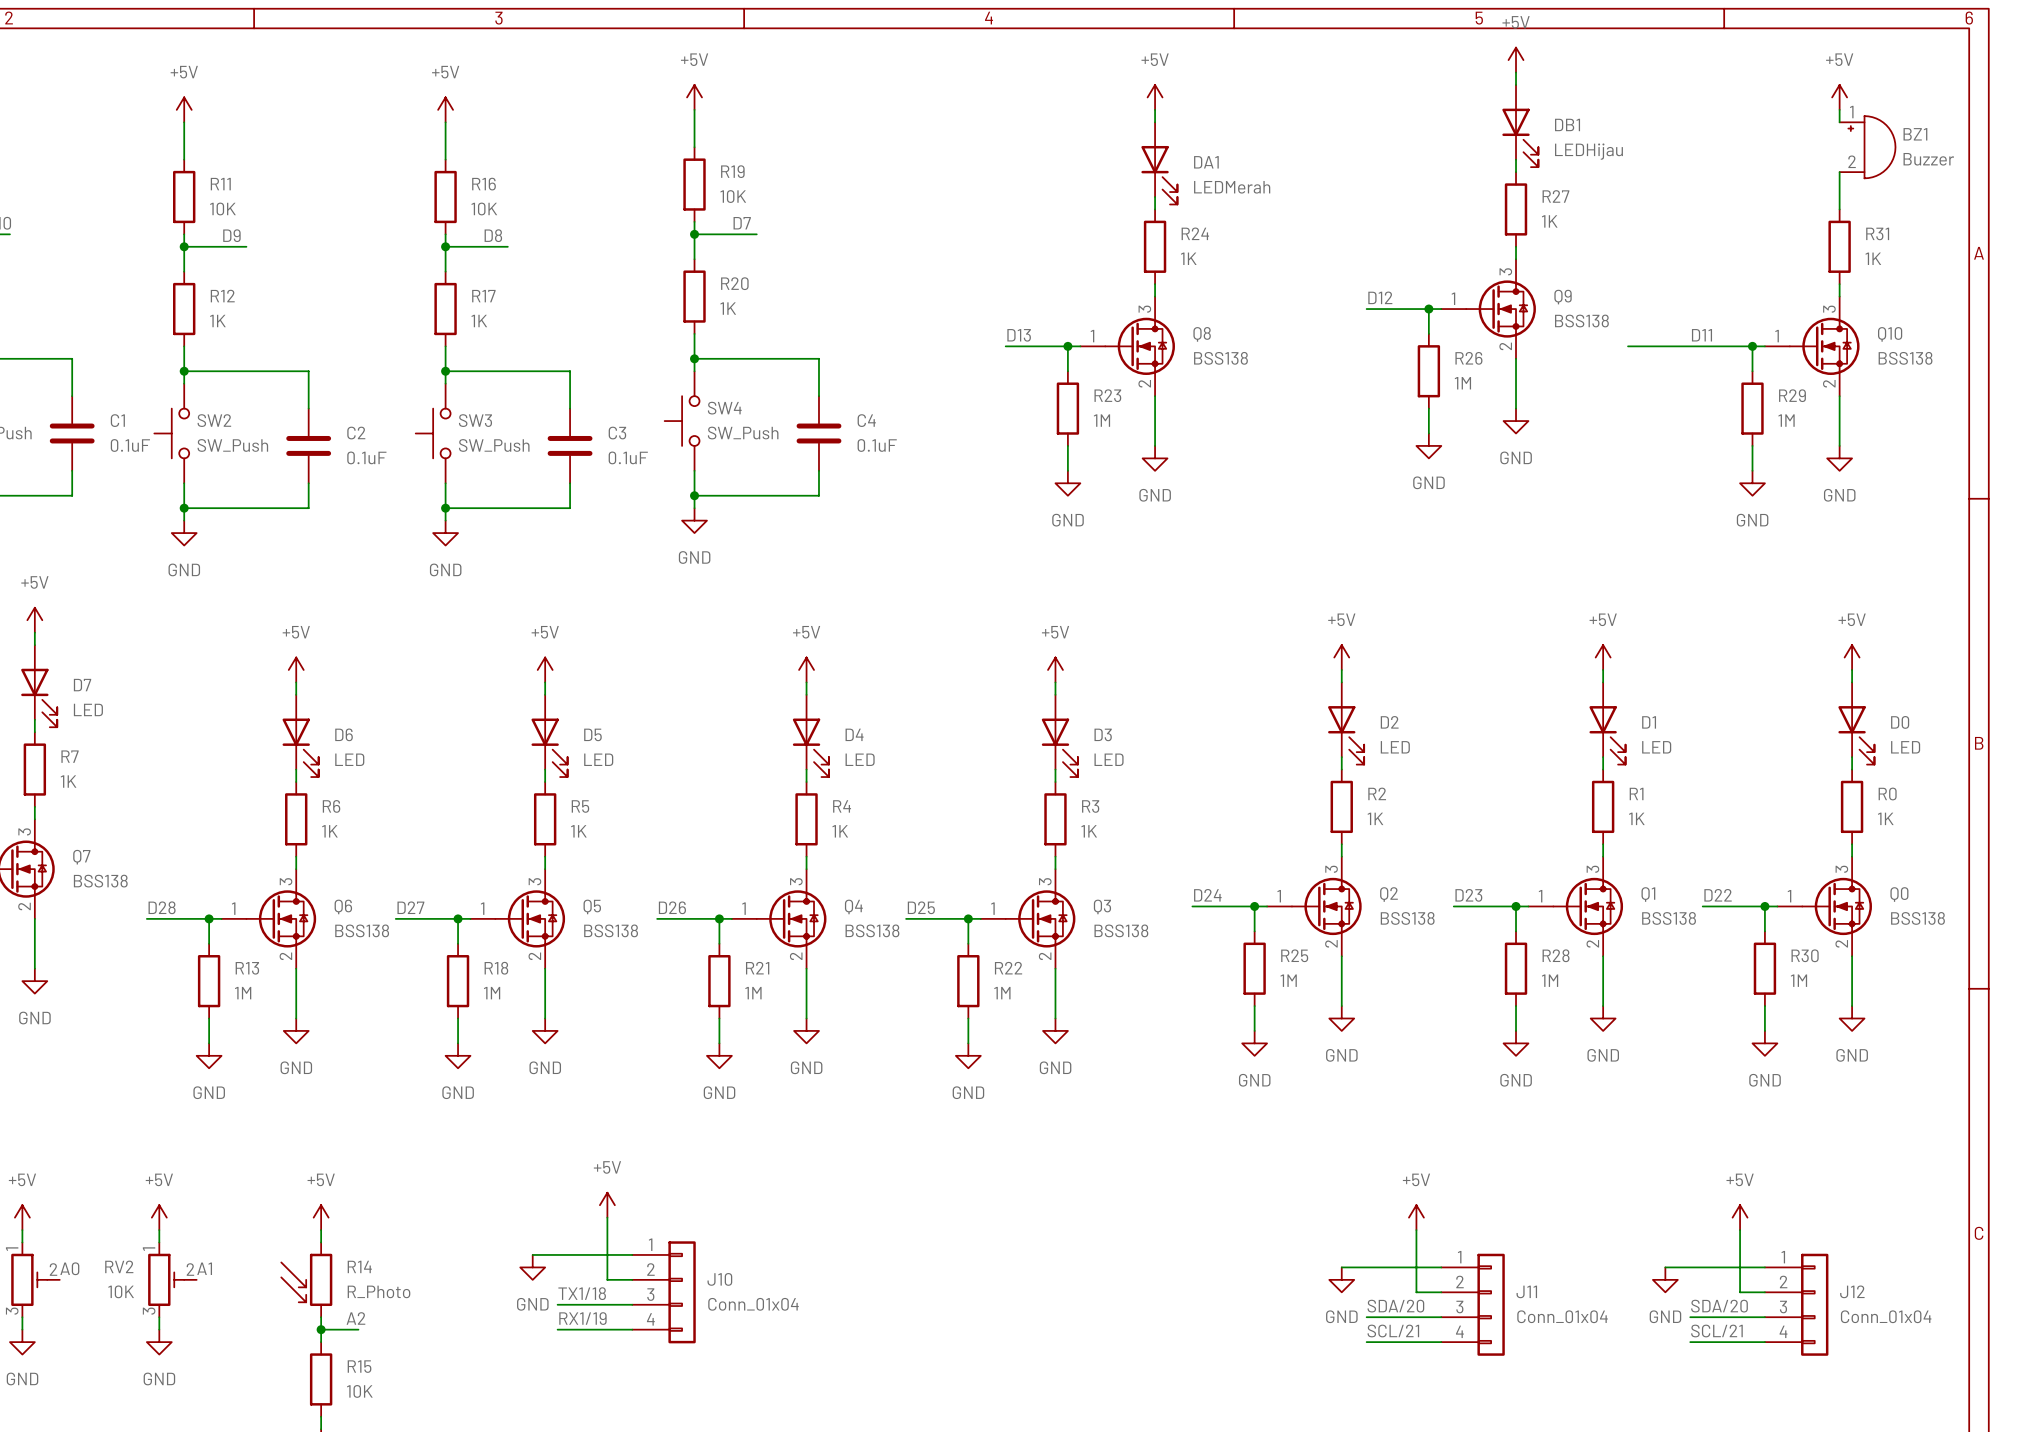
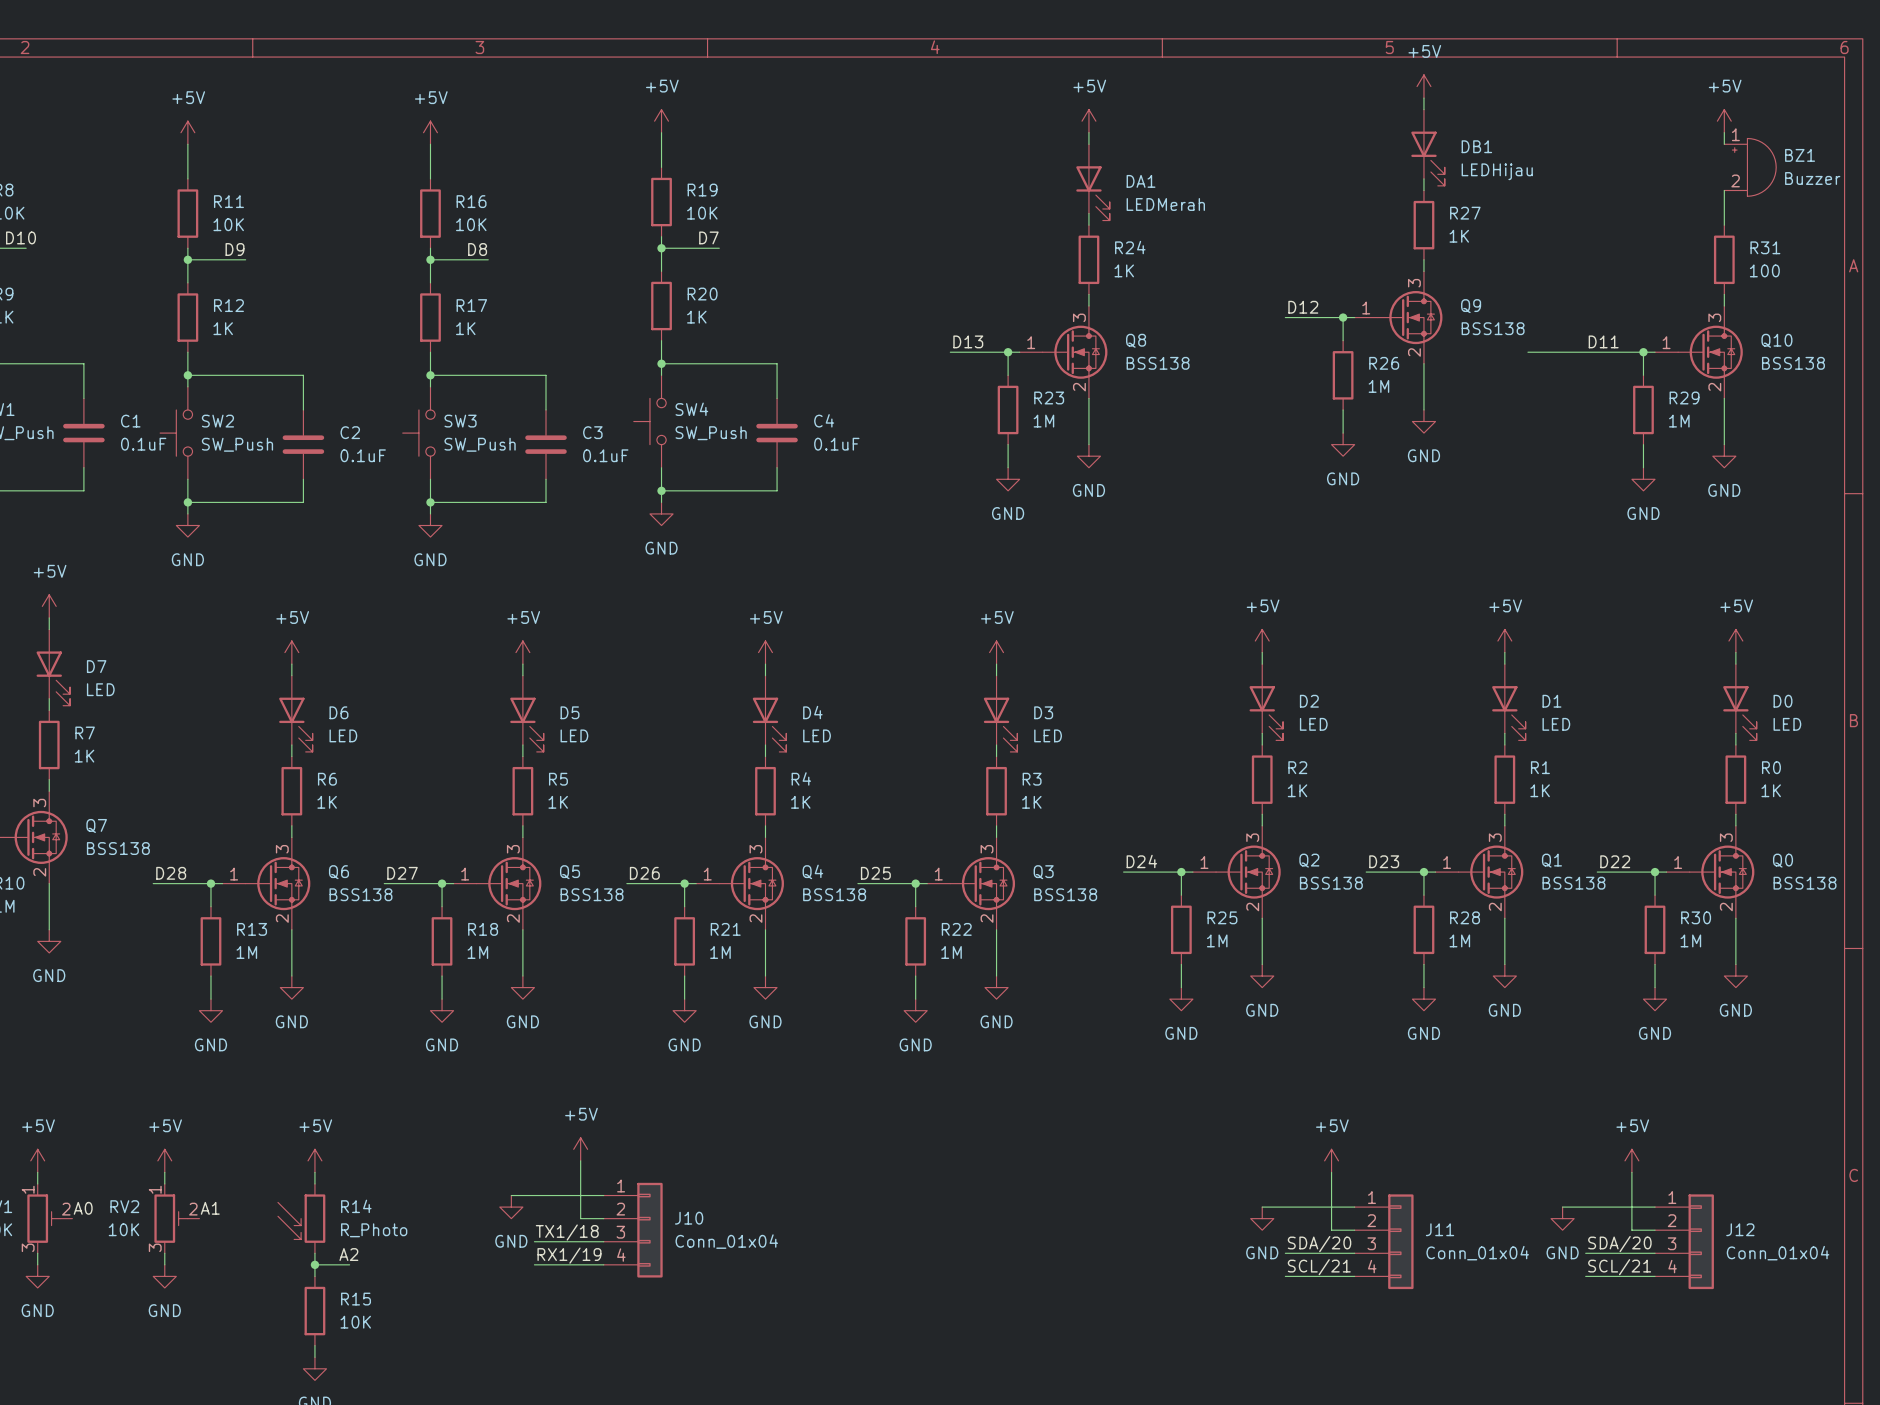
R31 value: 1K (1873, 258) -> 100 (1764, 270)

